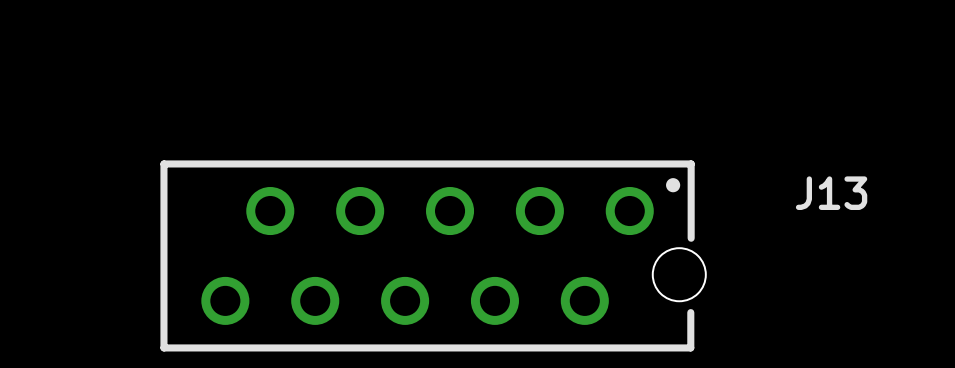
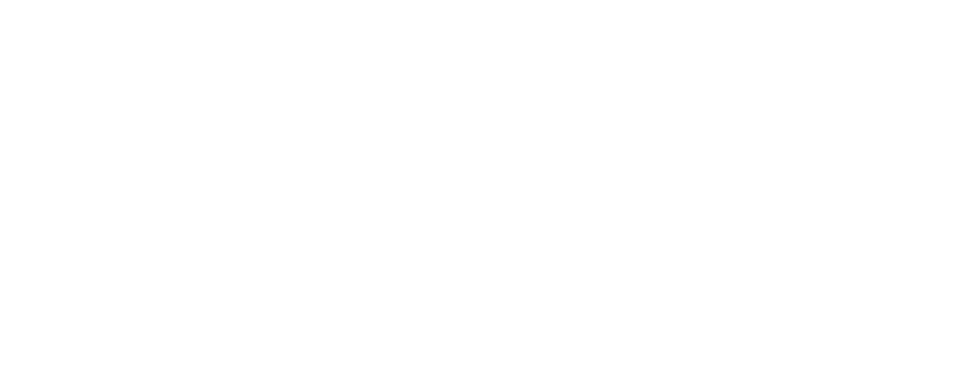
J13: (433, 255) -> none

